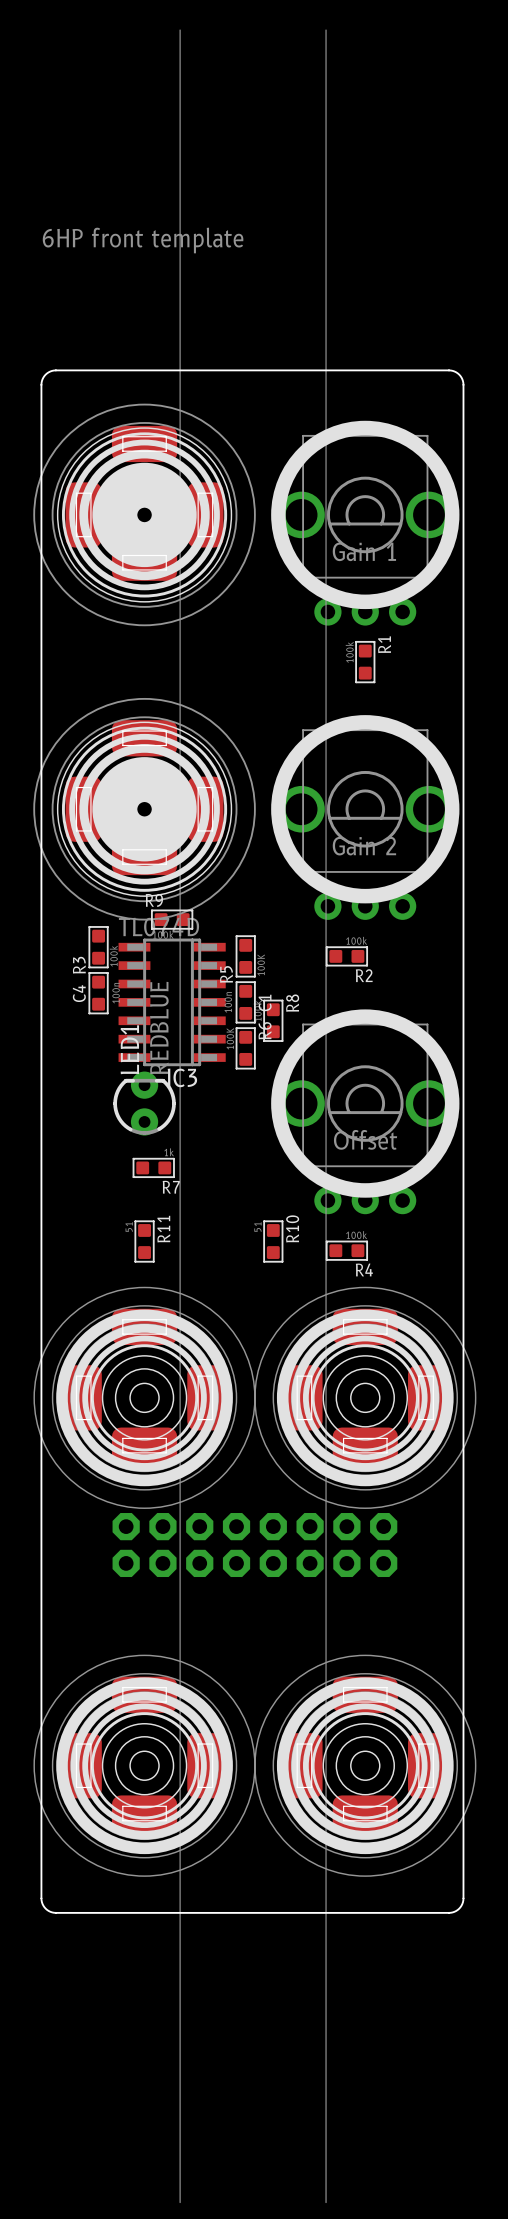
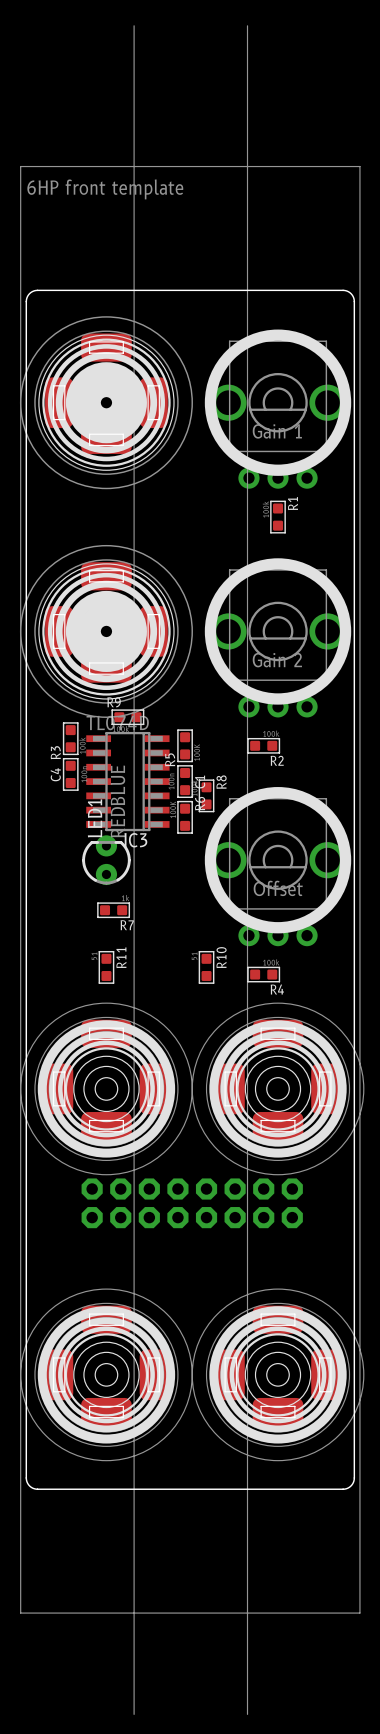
drawing shape: [40, 30, 465, 2203] -> [20, 25, 360, 1715]

